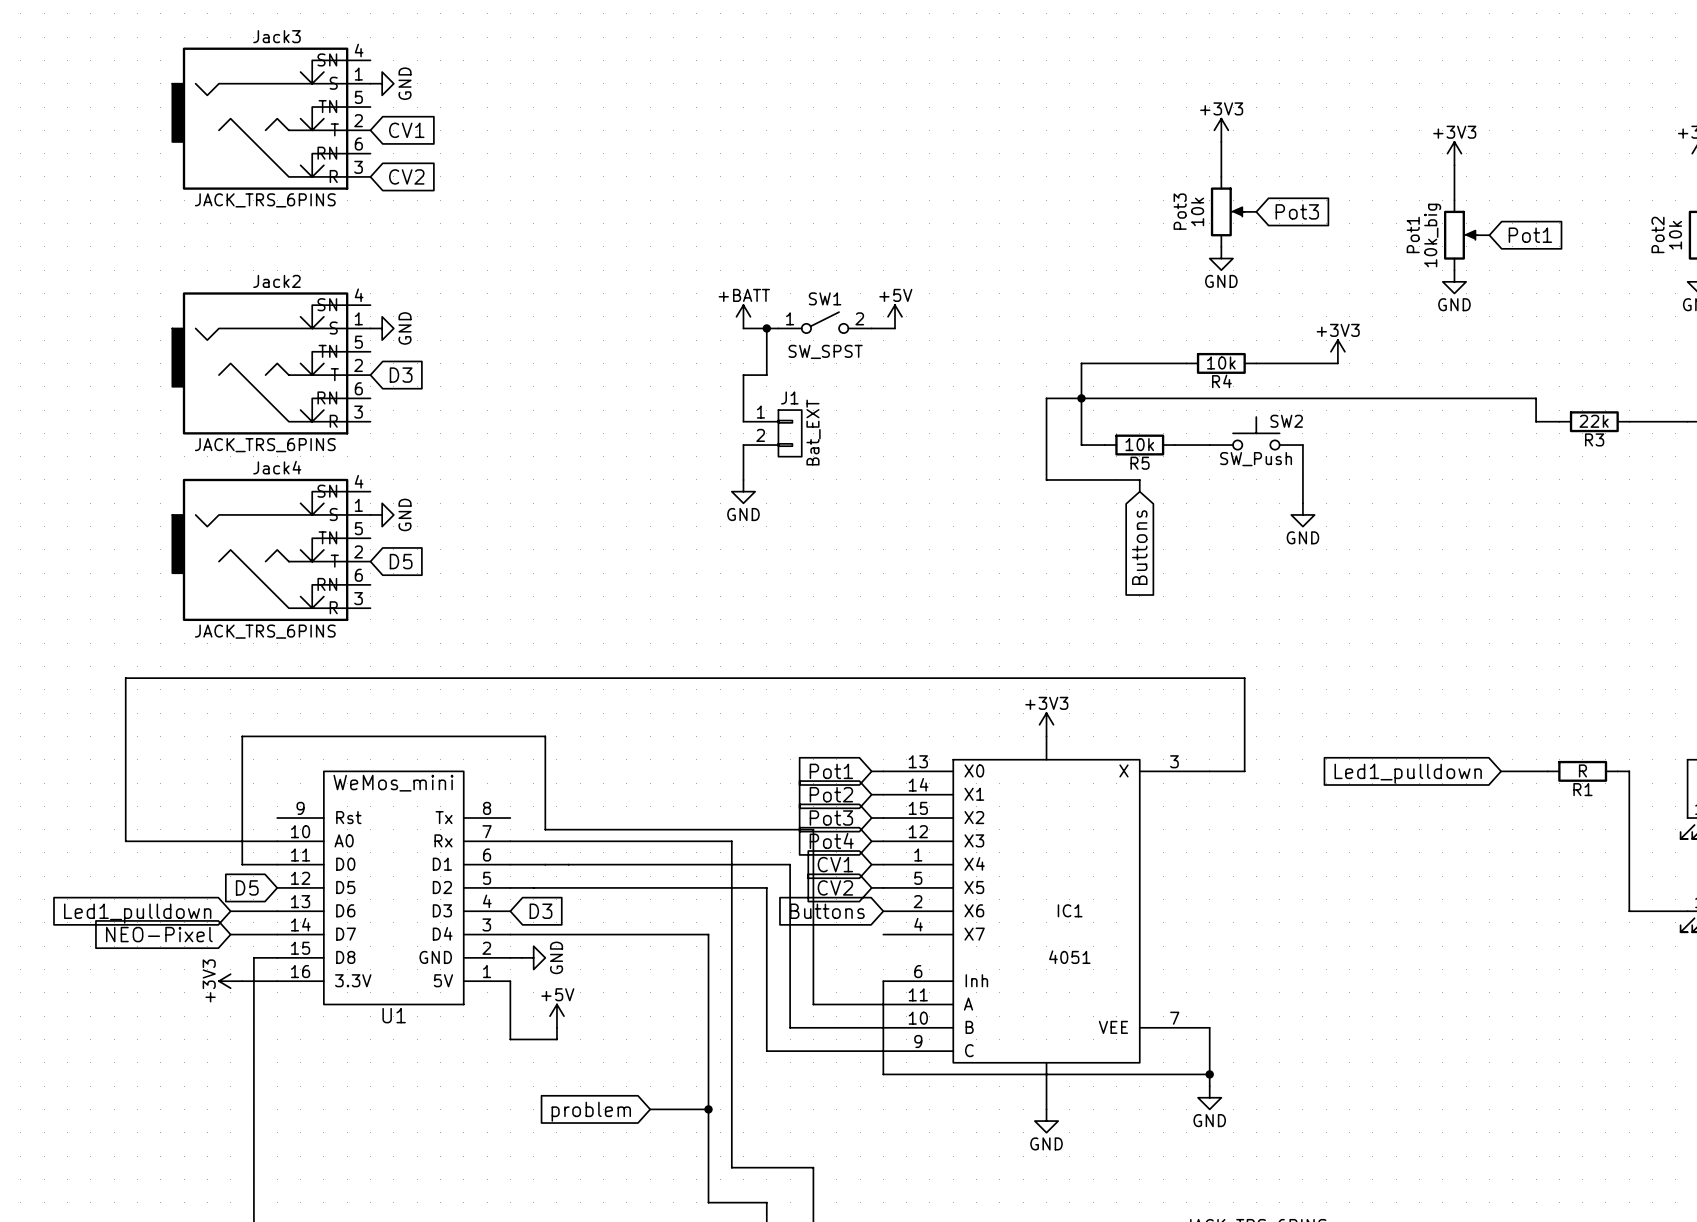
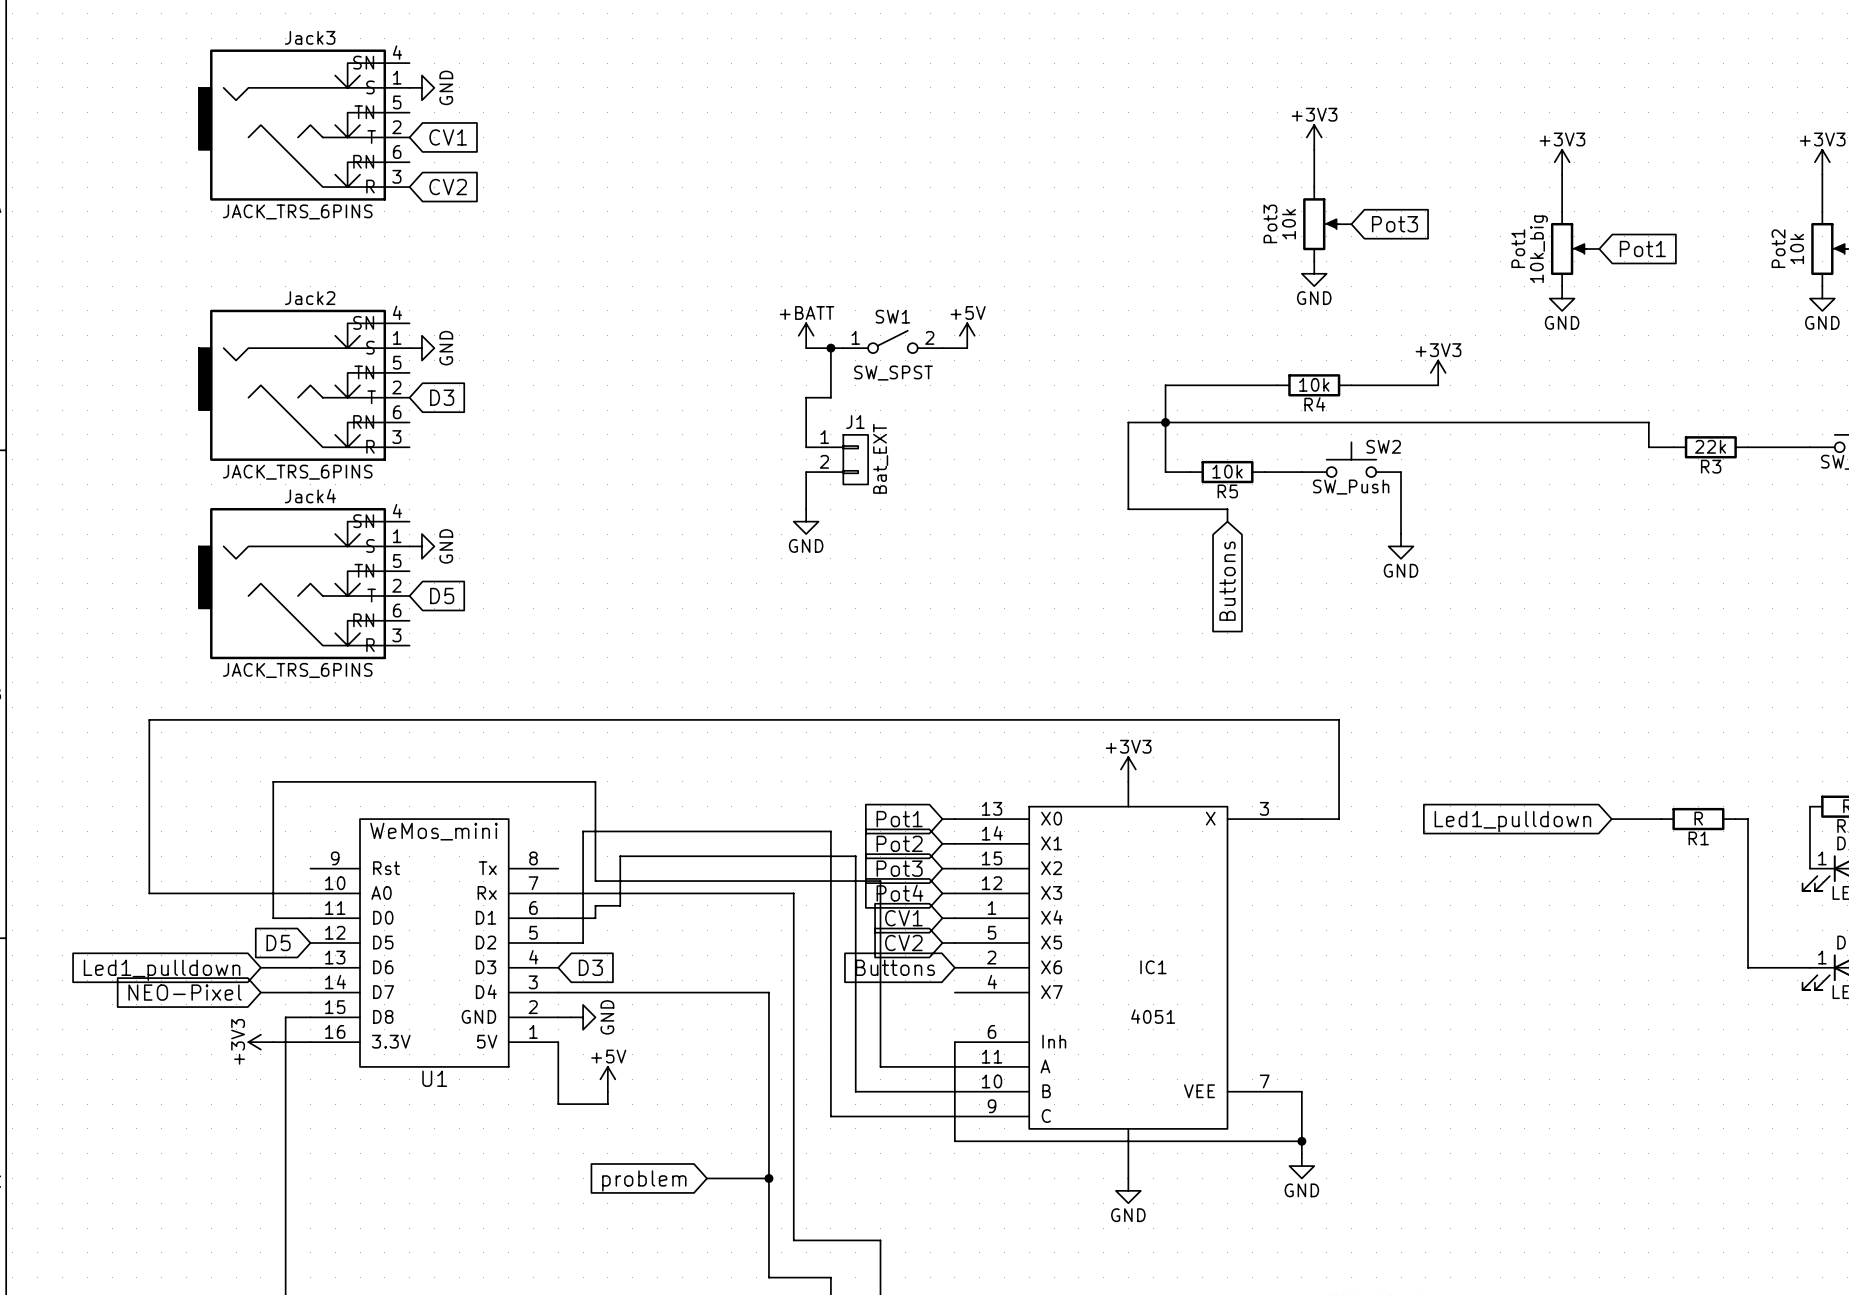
wire: (545, 864) (790, 864) -> (595, 918) (595, 905) (620, 905) (620, 856) (855, 856) (855, 918)
wire: (533, 887) (766, 887) -> (583, 943) (583, 831) (830, 831) (830, 943)

